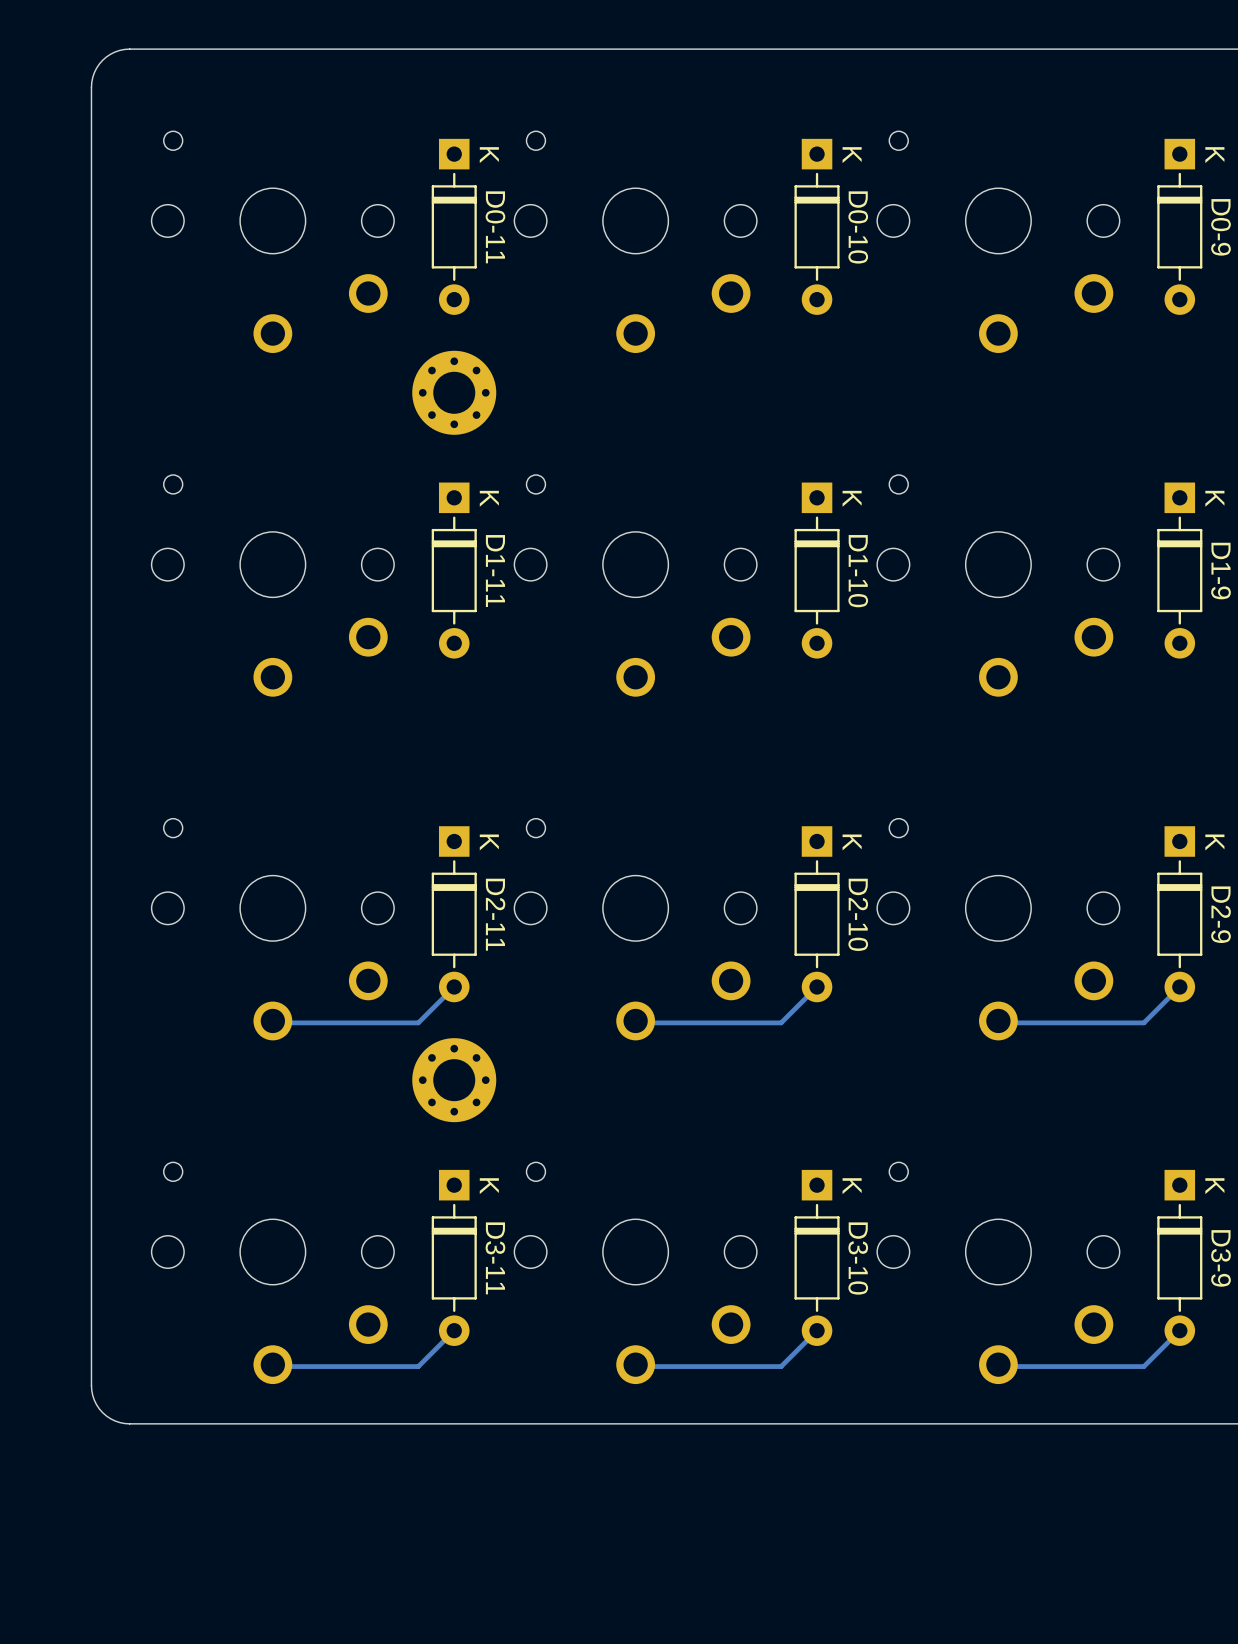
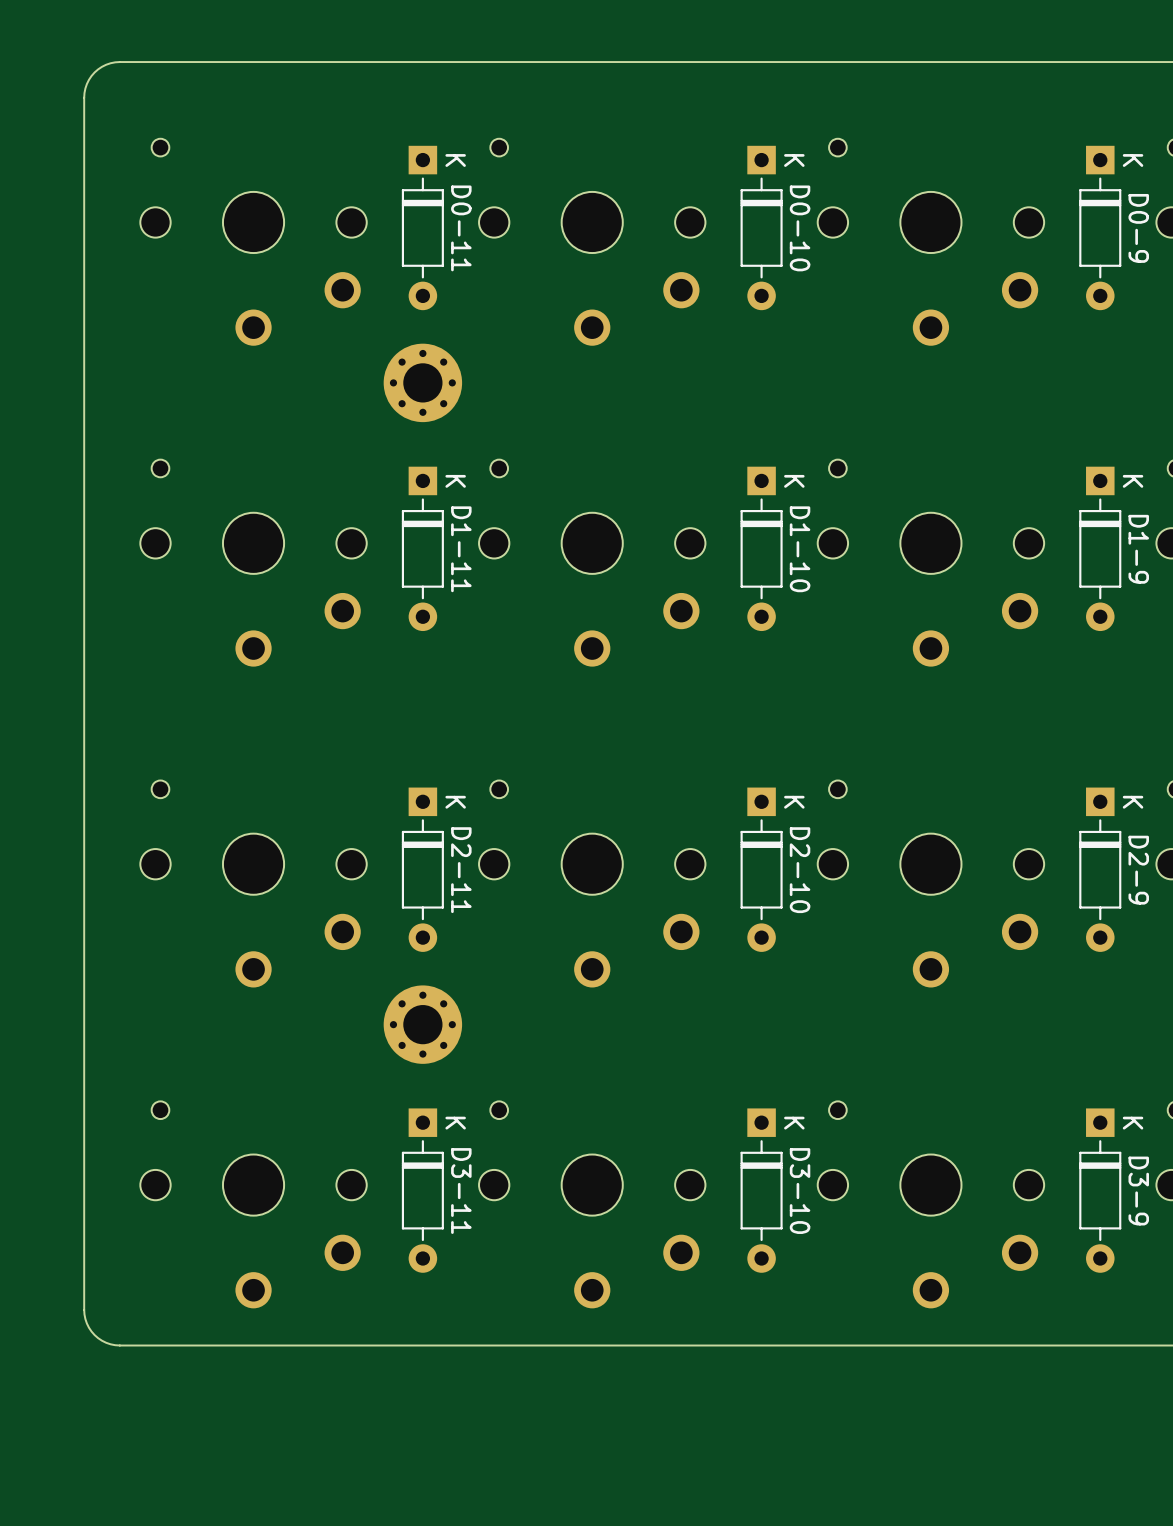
track: (454, 986) (418, 1022) (274, 1022) (272, 1020) -> none
track: (817, 986) (781, 1022) (637, 1022) (635, 1020) -> none
track: (1179, 986) (1143, 1022) (1000, 1022) (998, 1020) -> none
track: (454, 1330) (418, 1366) (274, 1366) (272, 1364) -> none
track: (817, 1330) (781, 1366) (637, 1366) (635, 1364) -> none
track: (1179, 1330) (1143, 1366) (1000, 1366) (998, 1364) -> none

